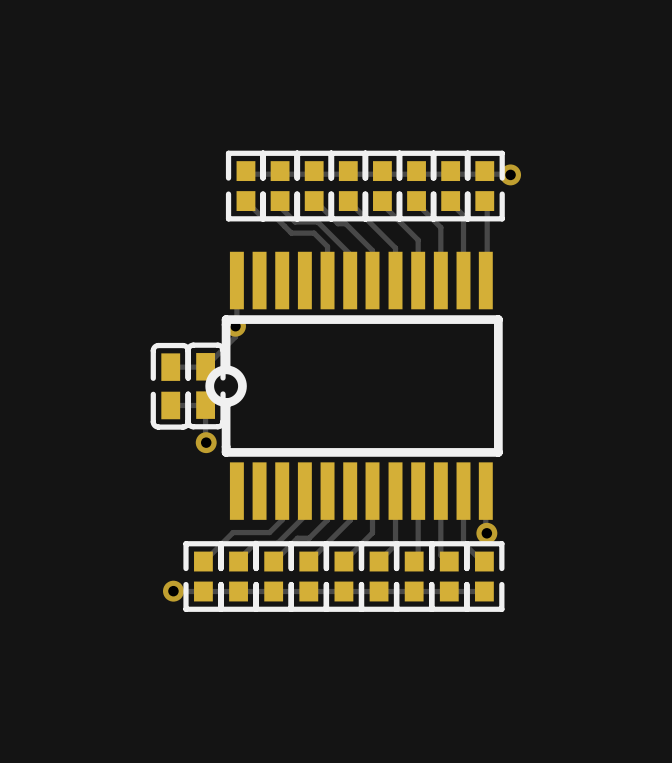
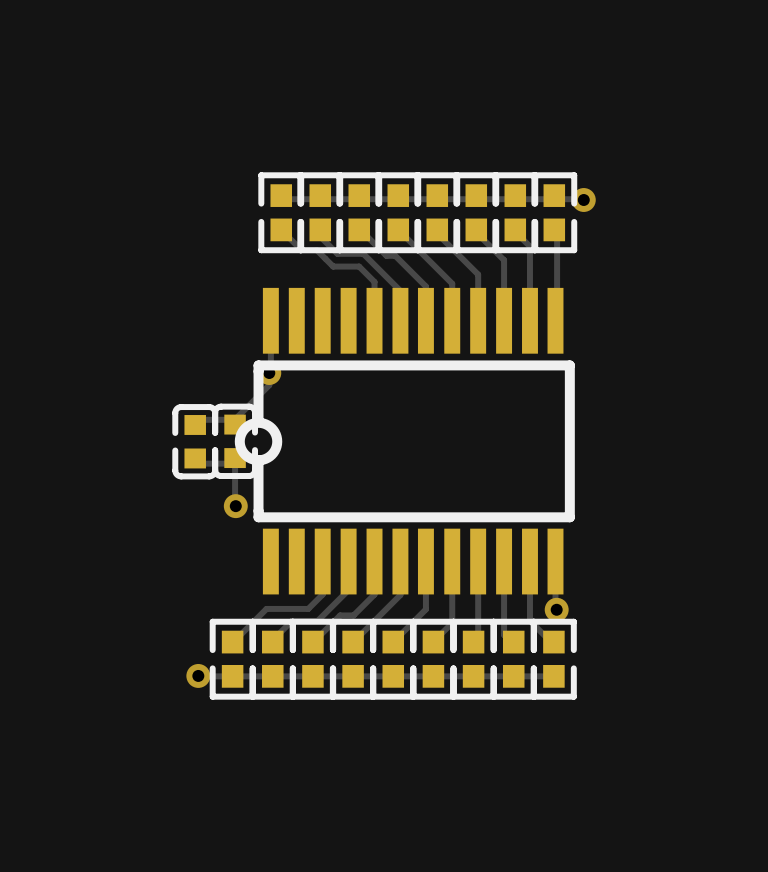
part footprint: [150, 342, 191, 430] -> [172, 404, 219, 480]
part footprint: [185, 342, 226, 430] -> [212, 403, 259, 479]

